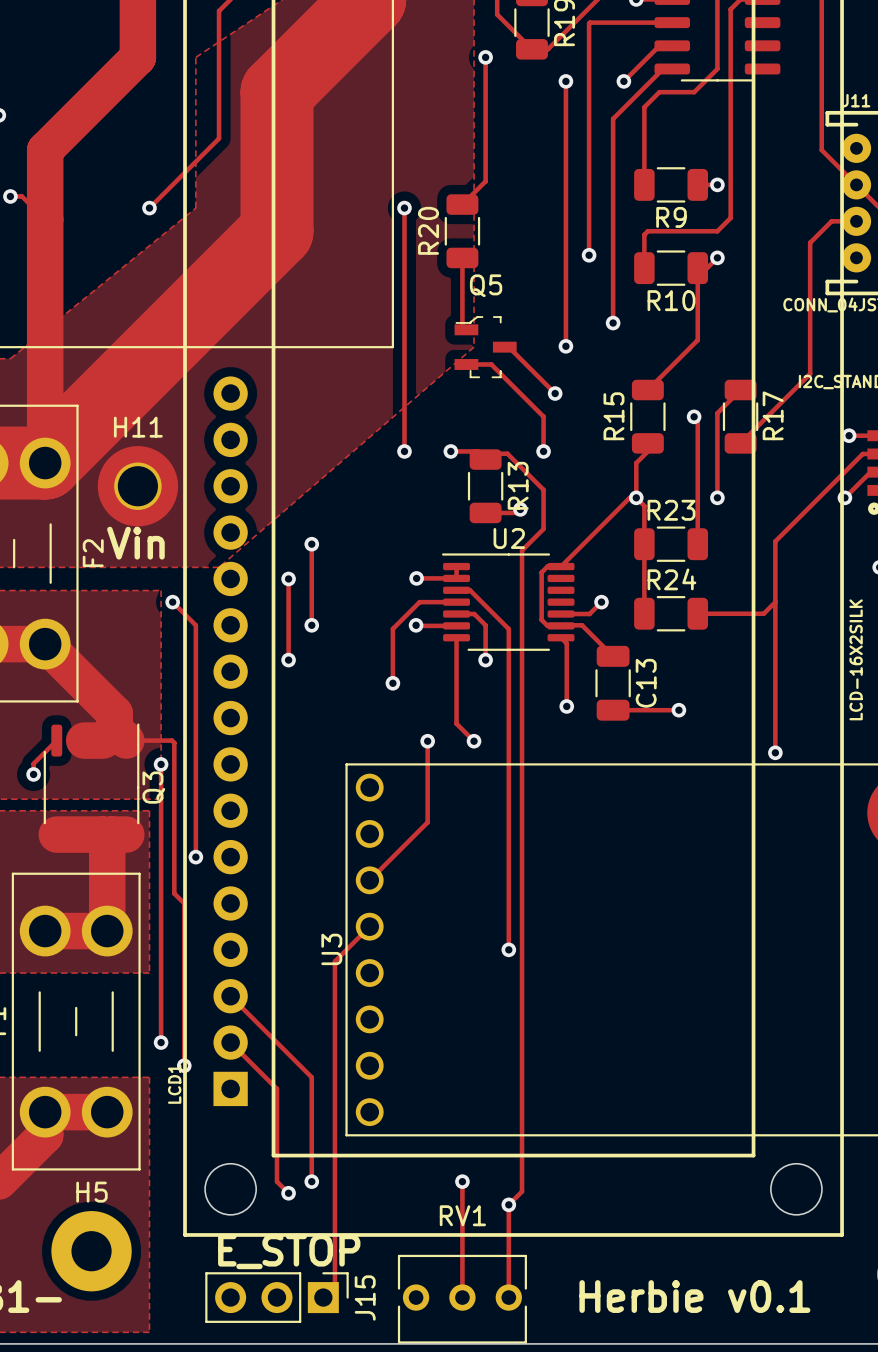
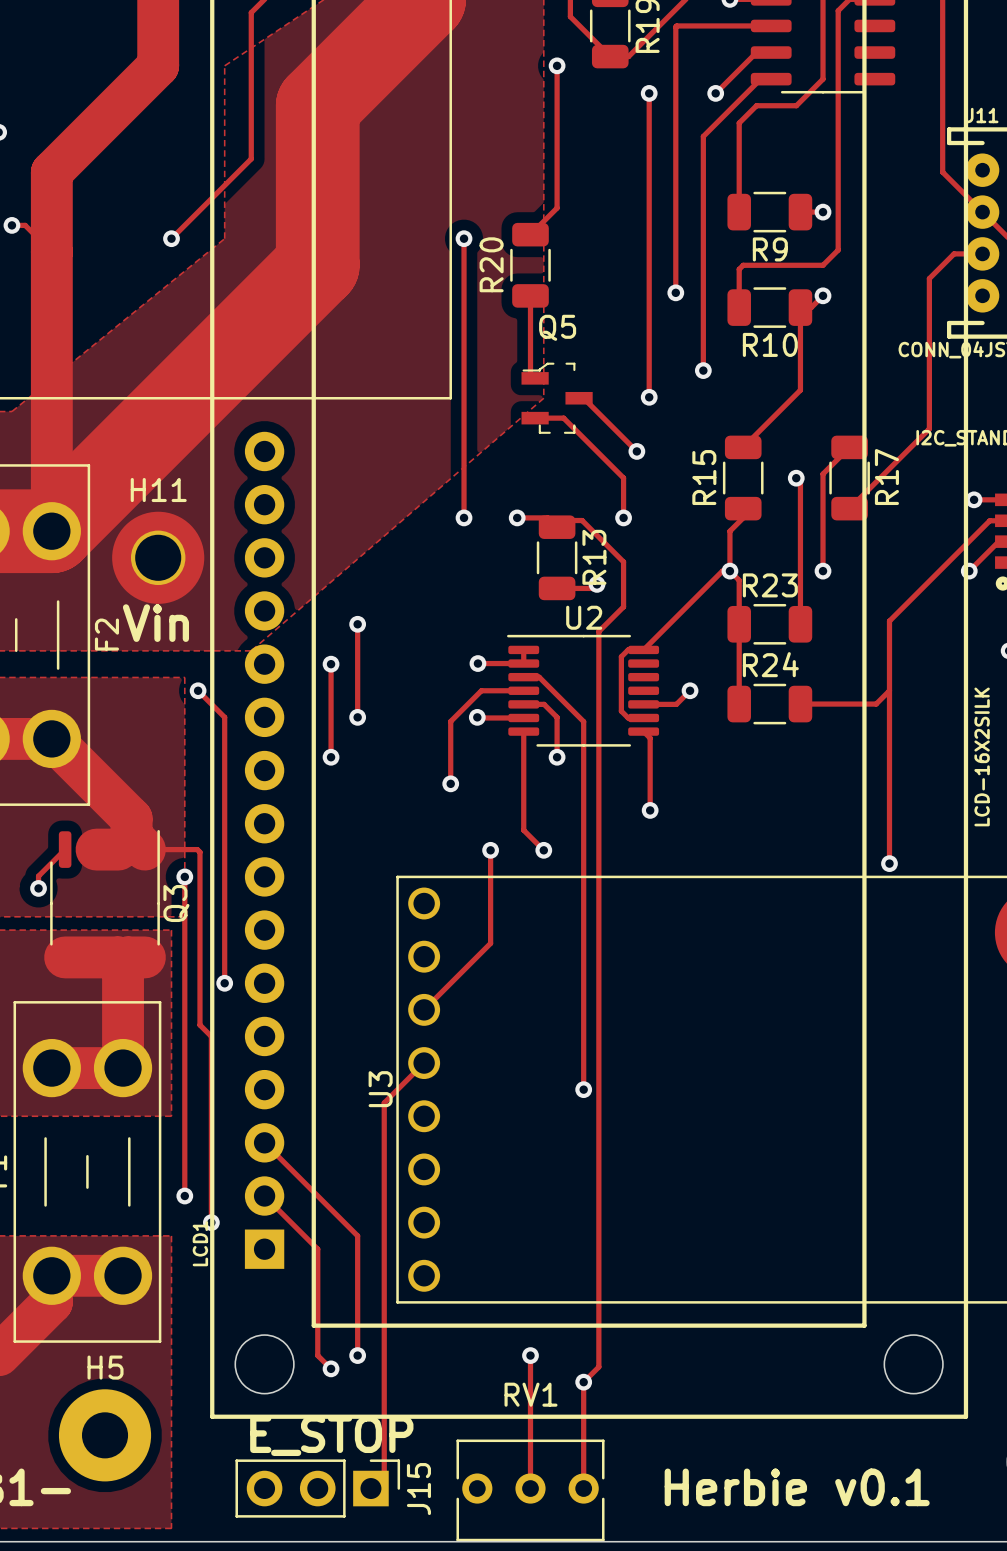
track: (561, 625) (582, 625) (613, 656) -> none
C13: (613, 683) -> none
track: (613, 710) (678, 710) -> none
via: (678, 710) -> none

